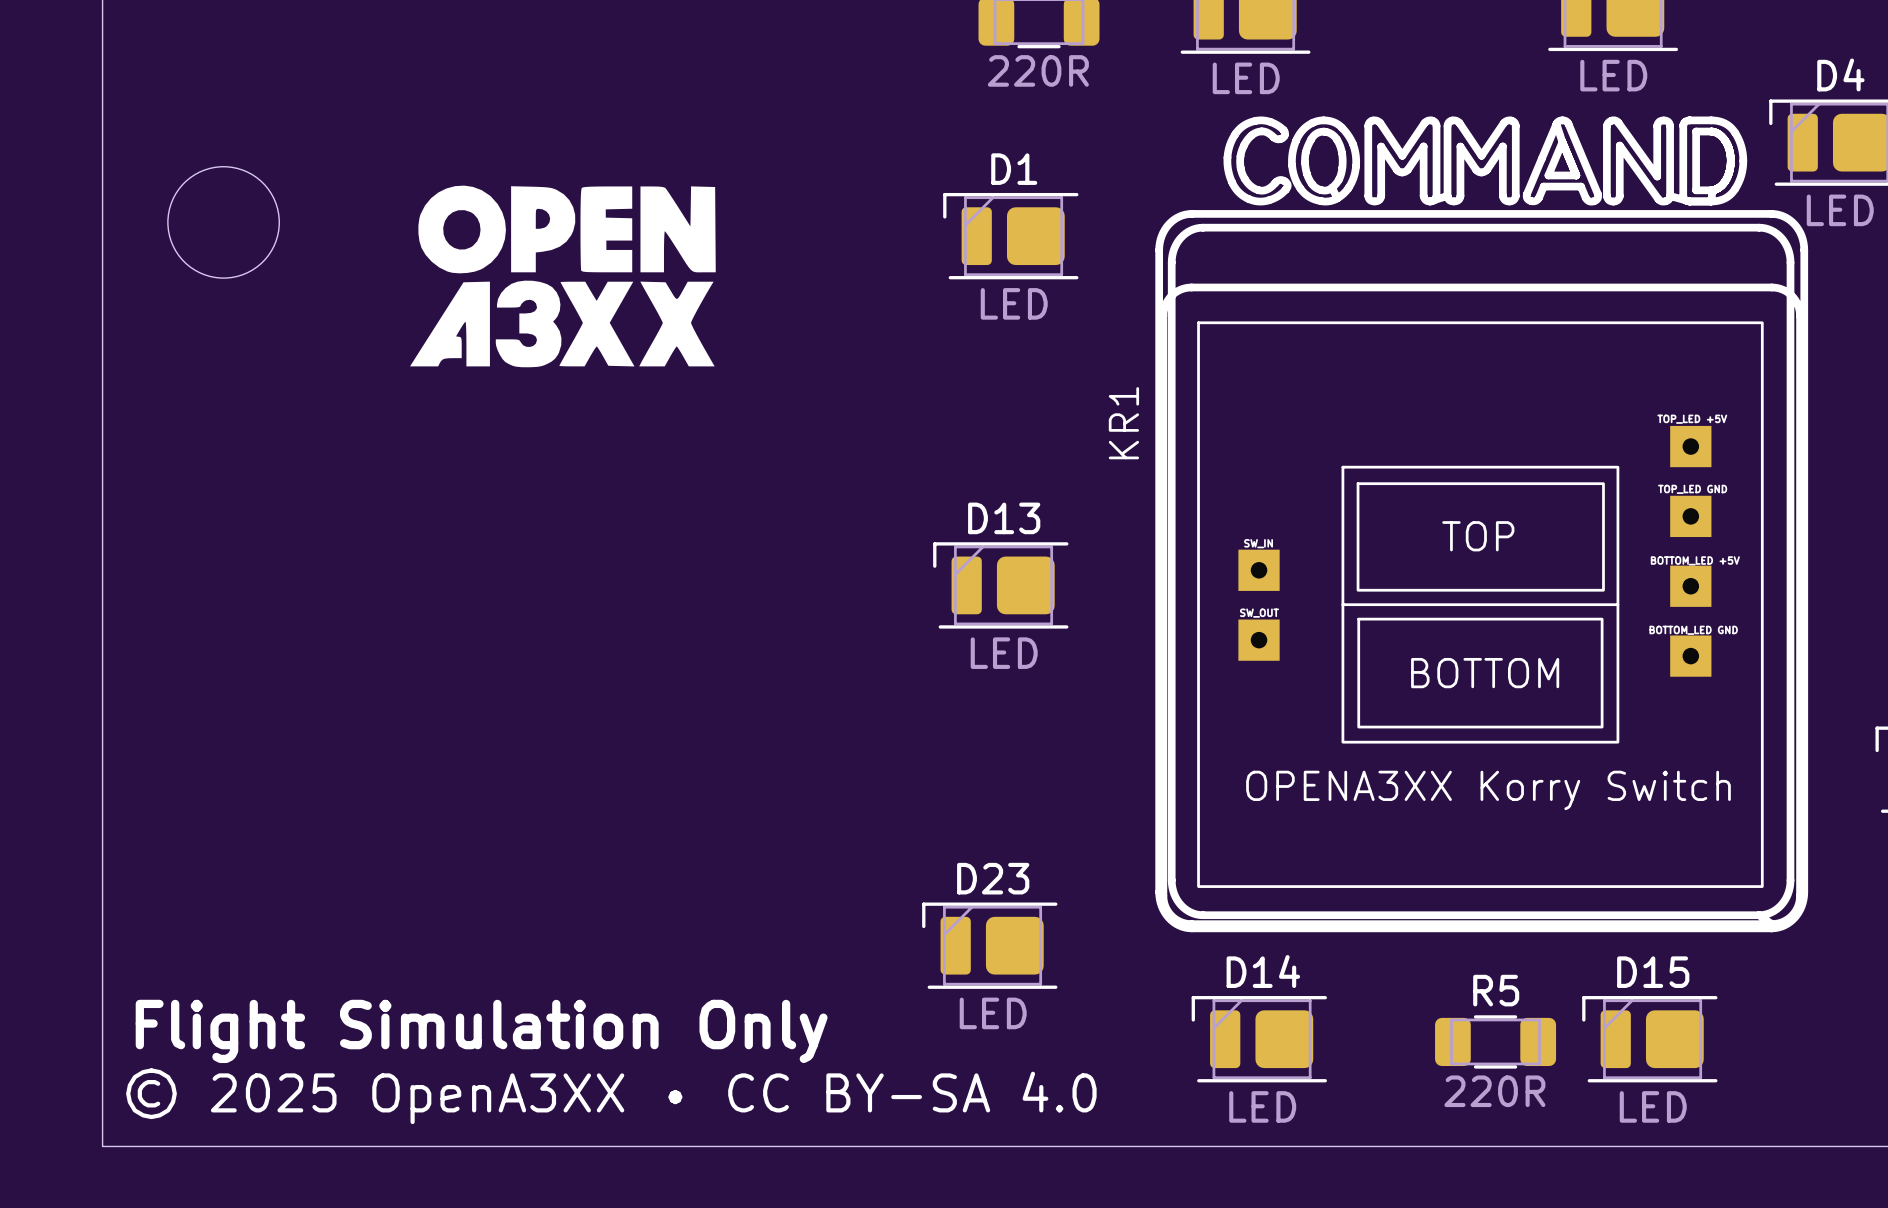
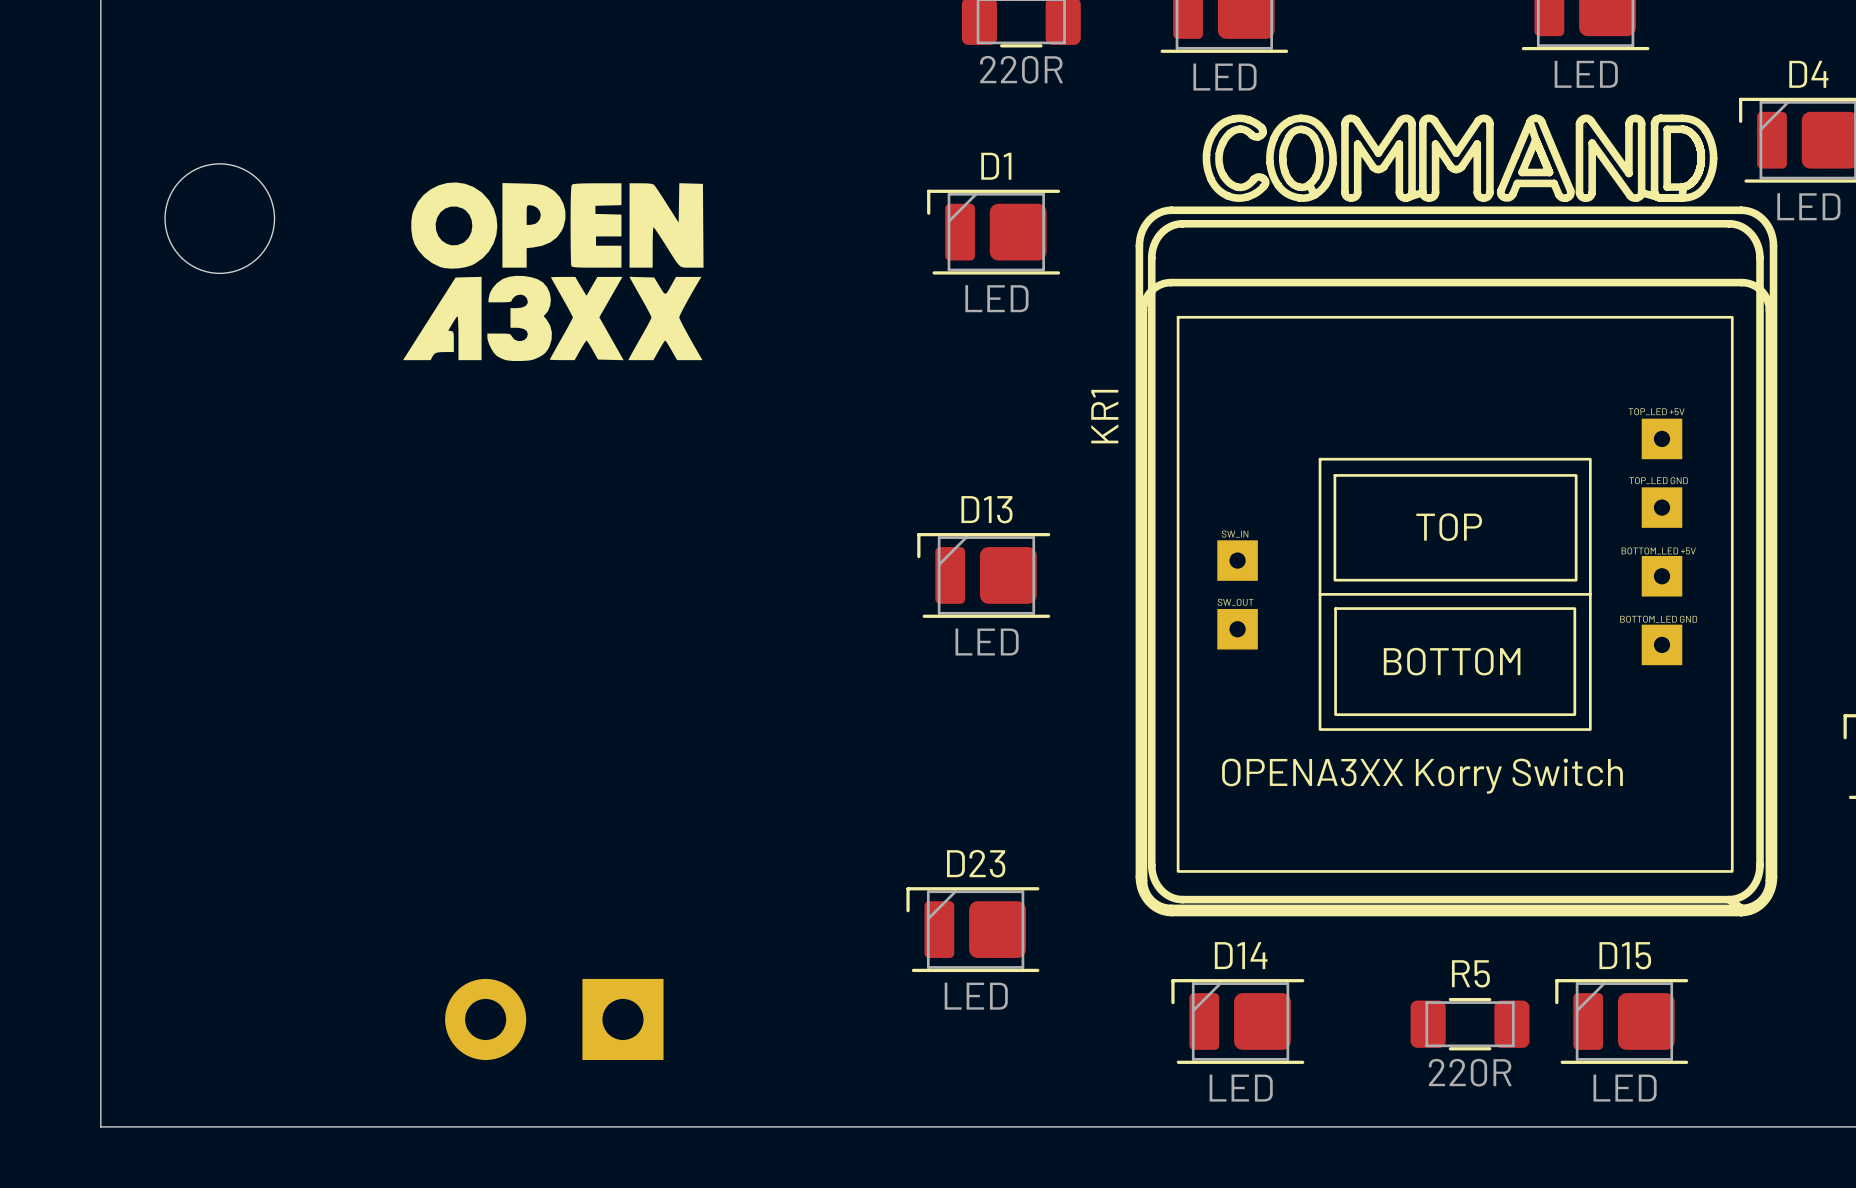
text: Flight Simulation Only (481, 1031) -> none
part: none -> (554, 1019)
text: © 2025 OpenA3XX • CC BY-SA 4.0 (611, 1096) -> none

